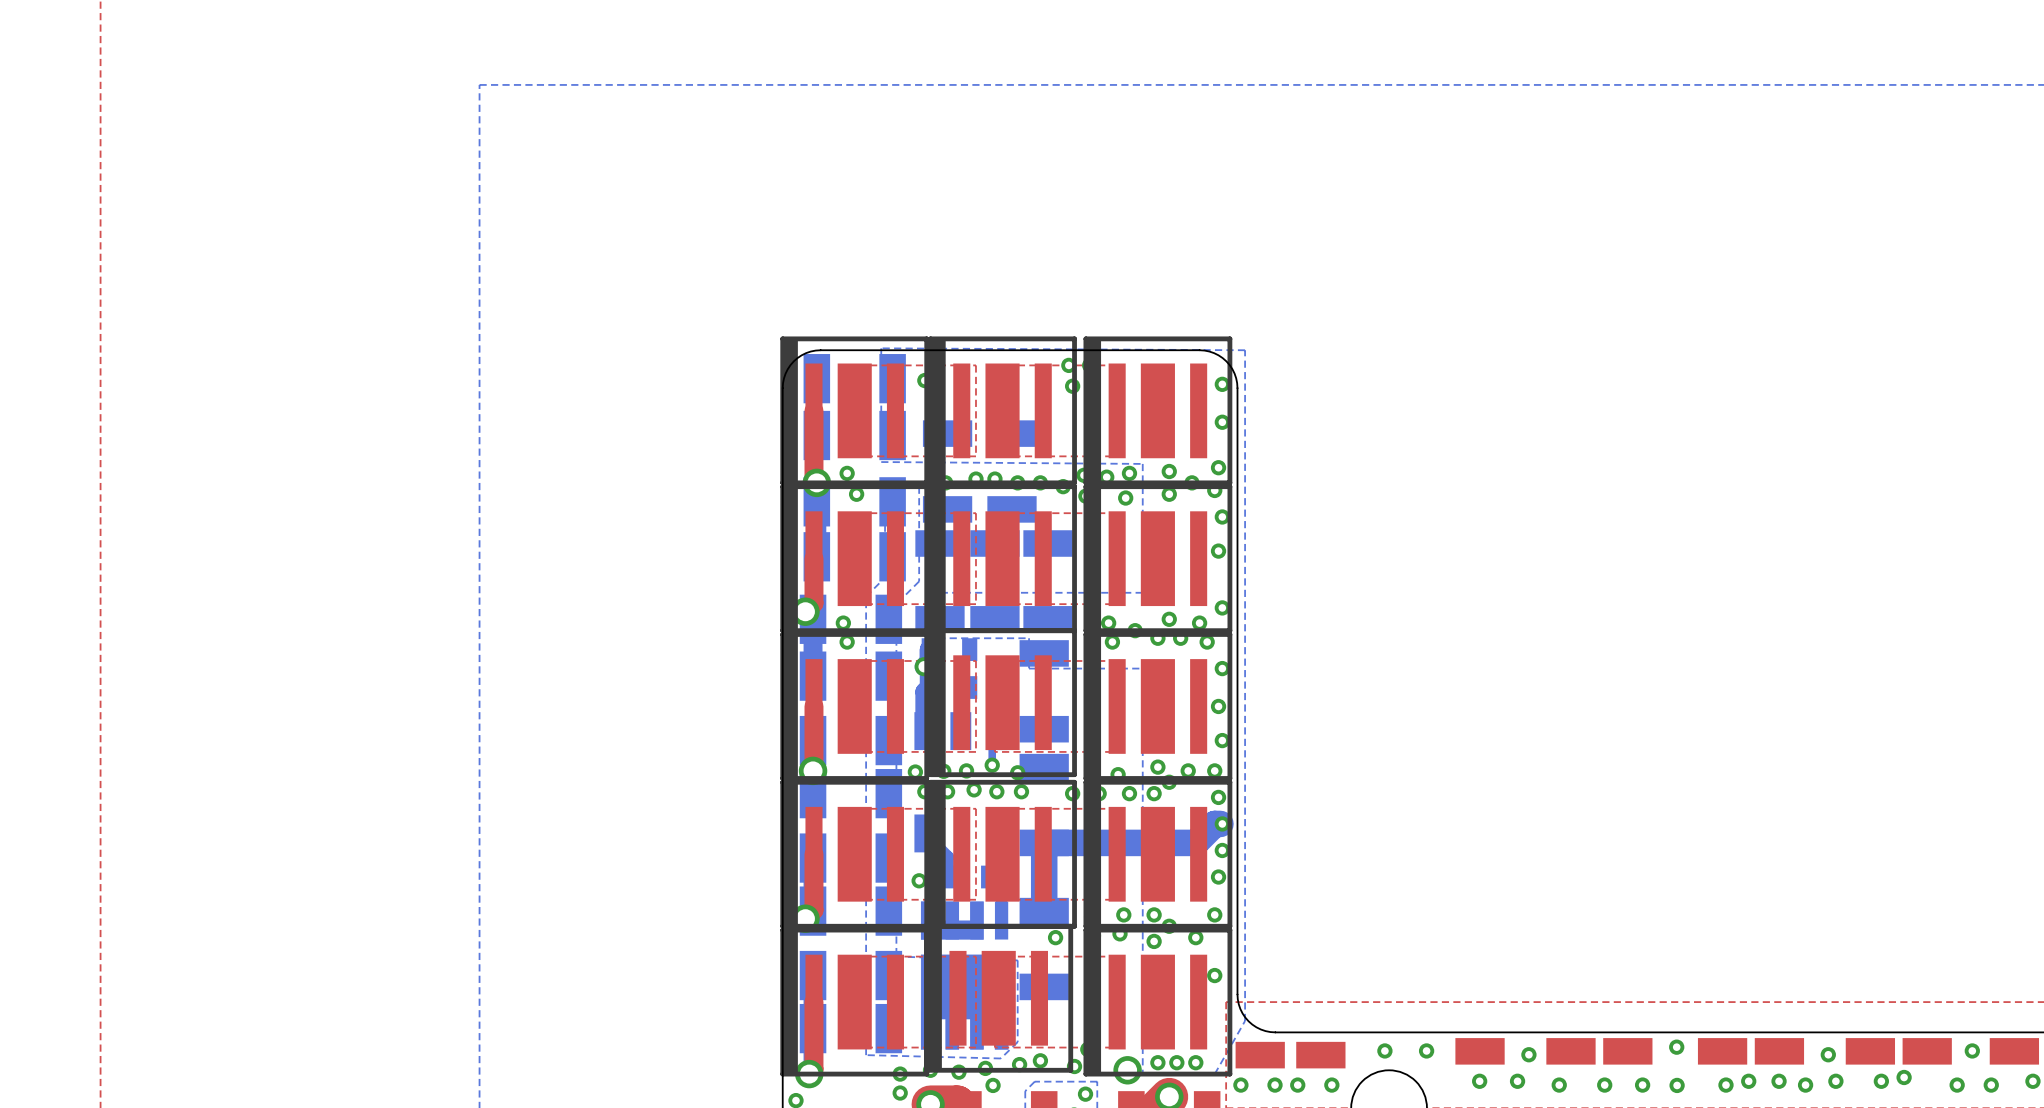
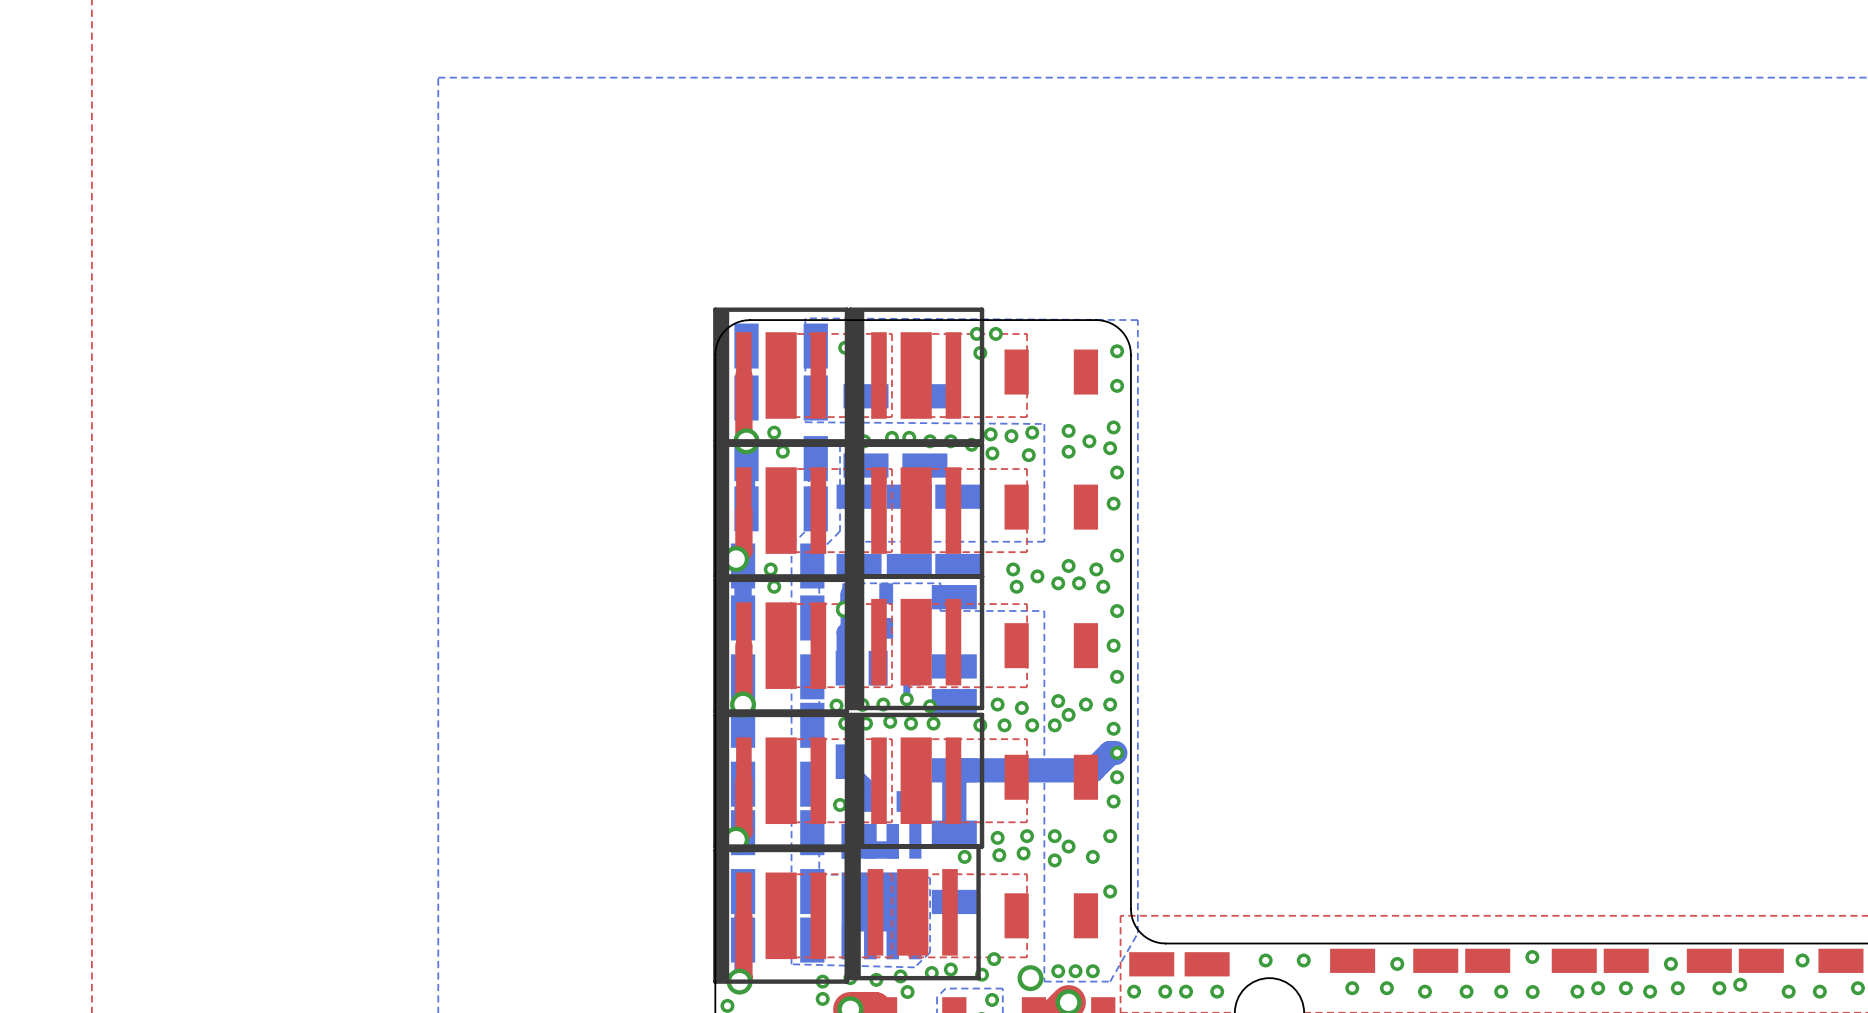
part footprint: [1083, 336, 1233, 486] -> [1004, 349, 1099, 395]
part footprint: [1083, 484, 1233, 634] -> [1004, 484, 1099, 530]
part footprint: [1083, 632, 1233, 781] -> [1004, 623, 1099, 669]
part footprint: [1083, 779, 1233, 929] -> [1004, 754, 1099, 800]
part footprint: [1083, 927, 1233, 1077] -> [1004, 893, 1099, 939]

